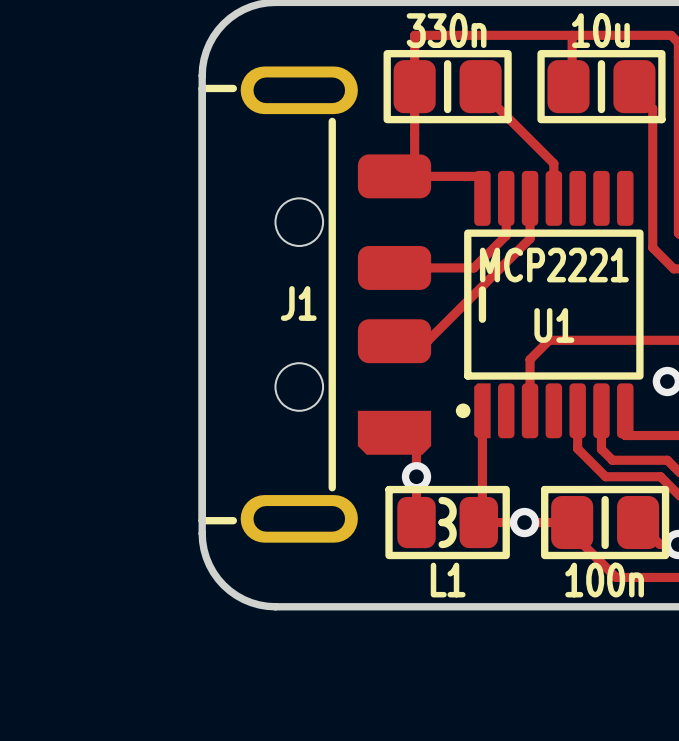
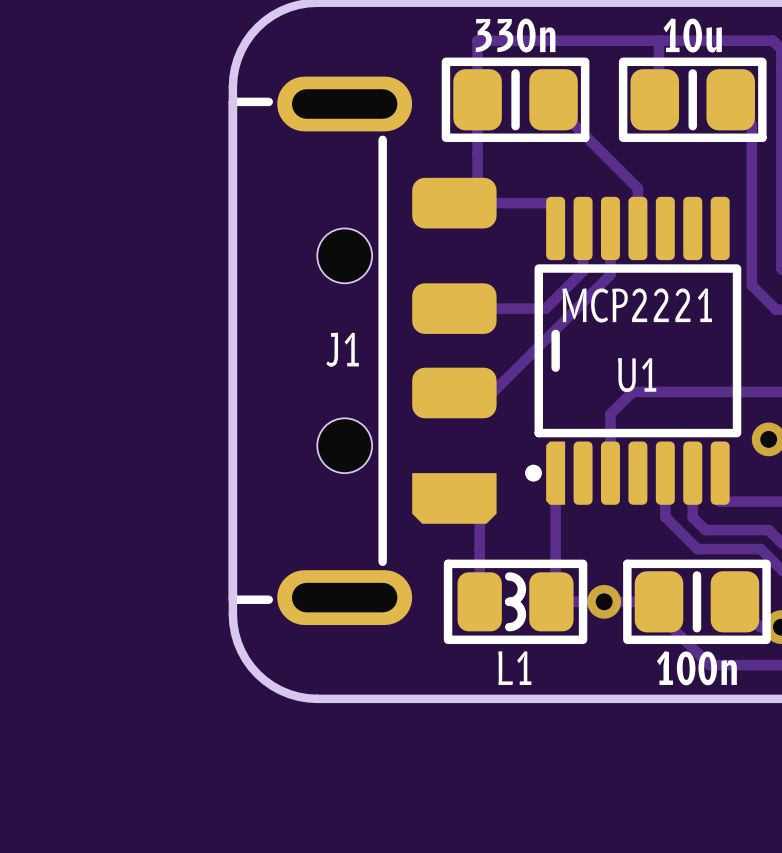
via: (416, 476) -> none

